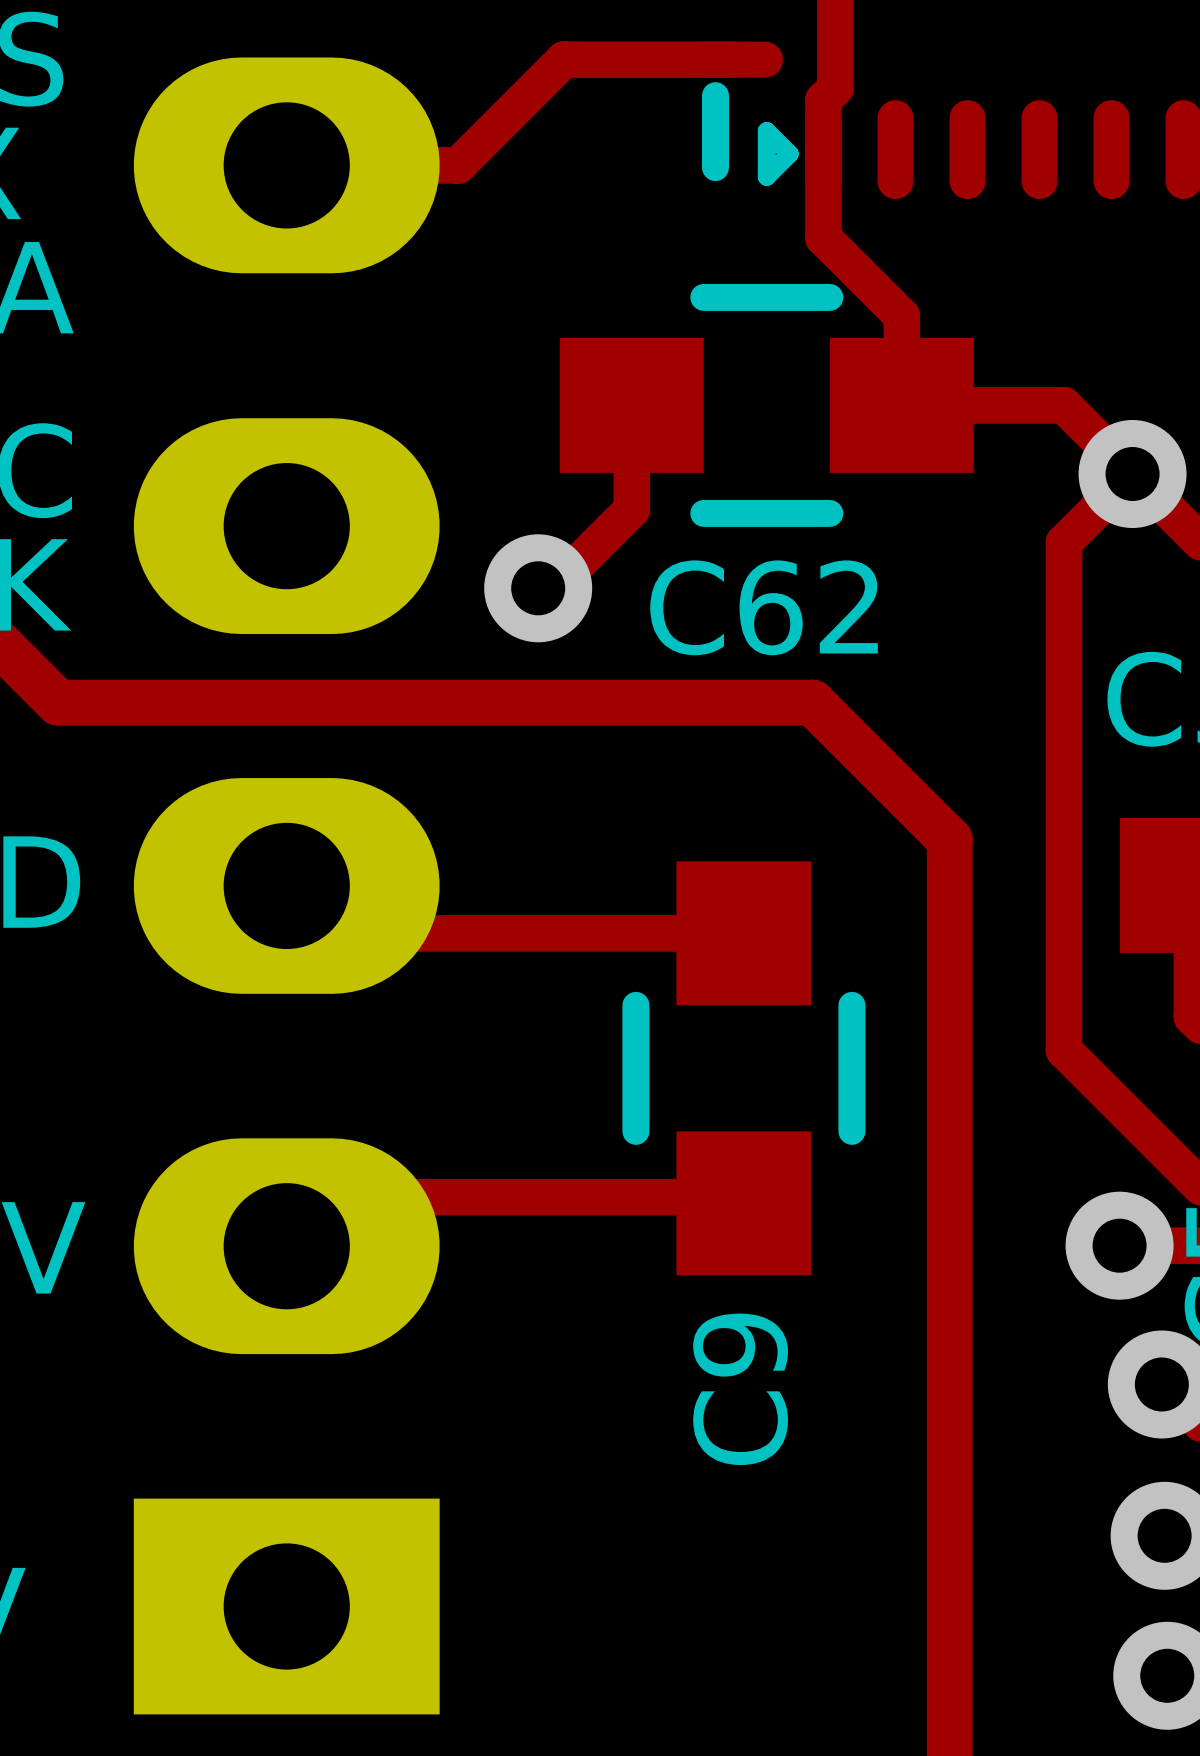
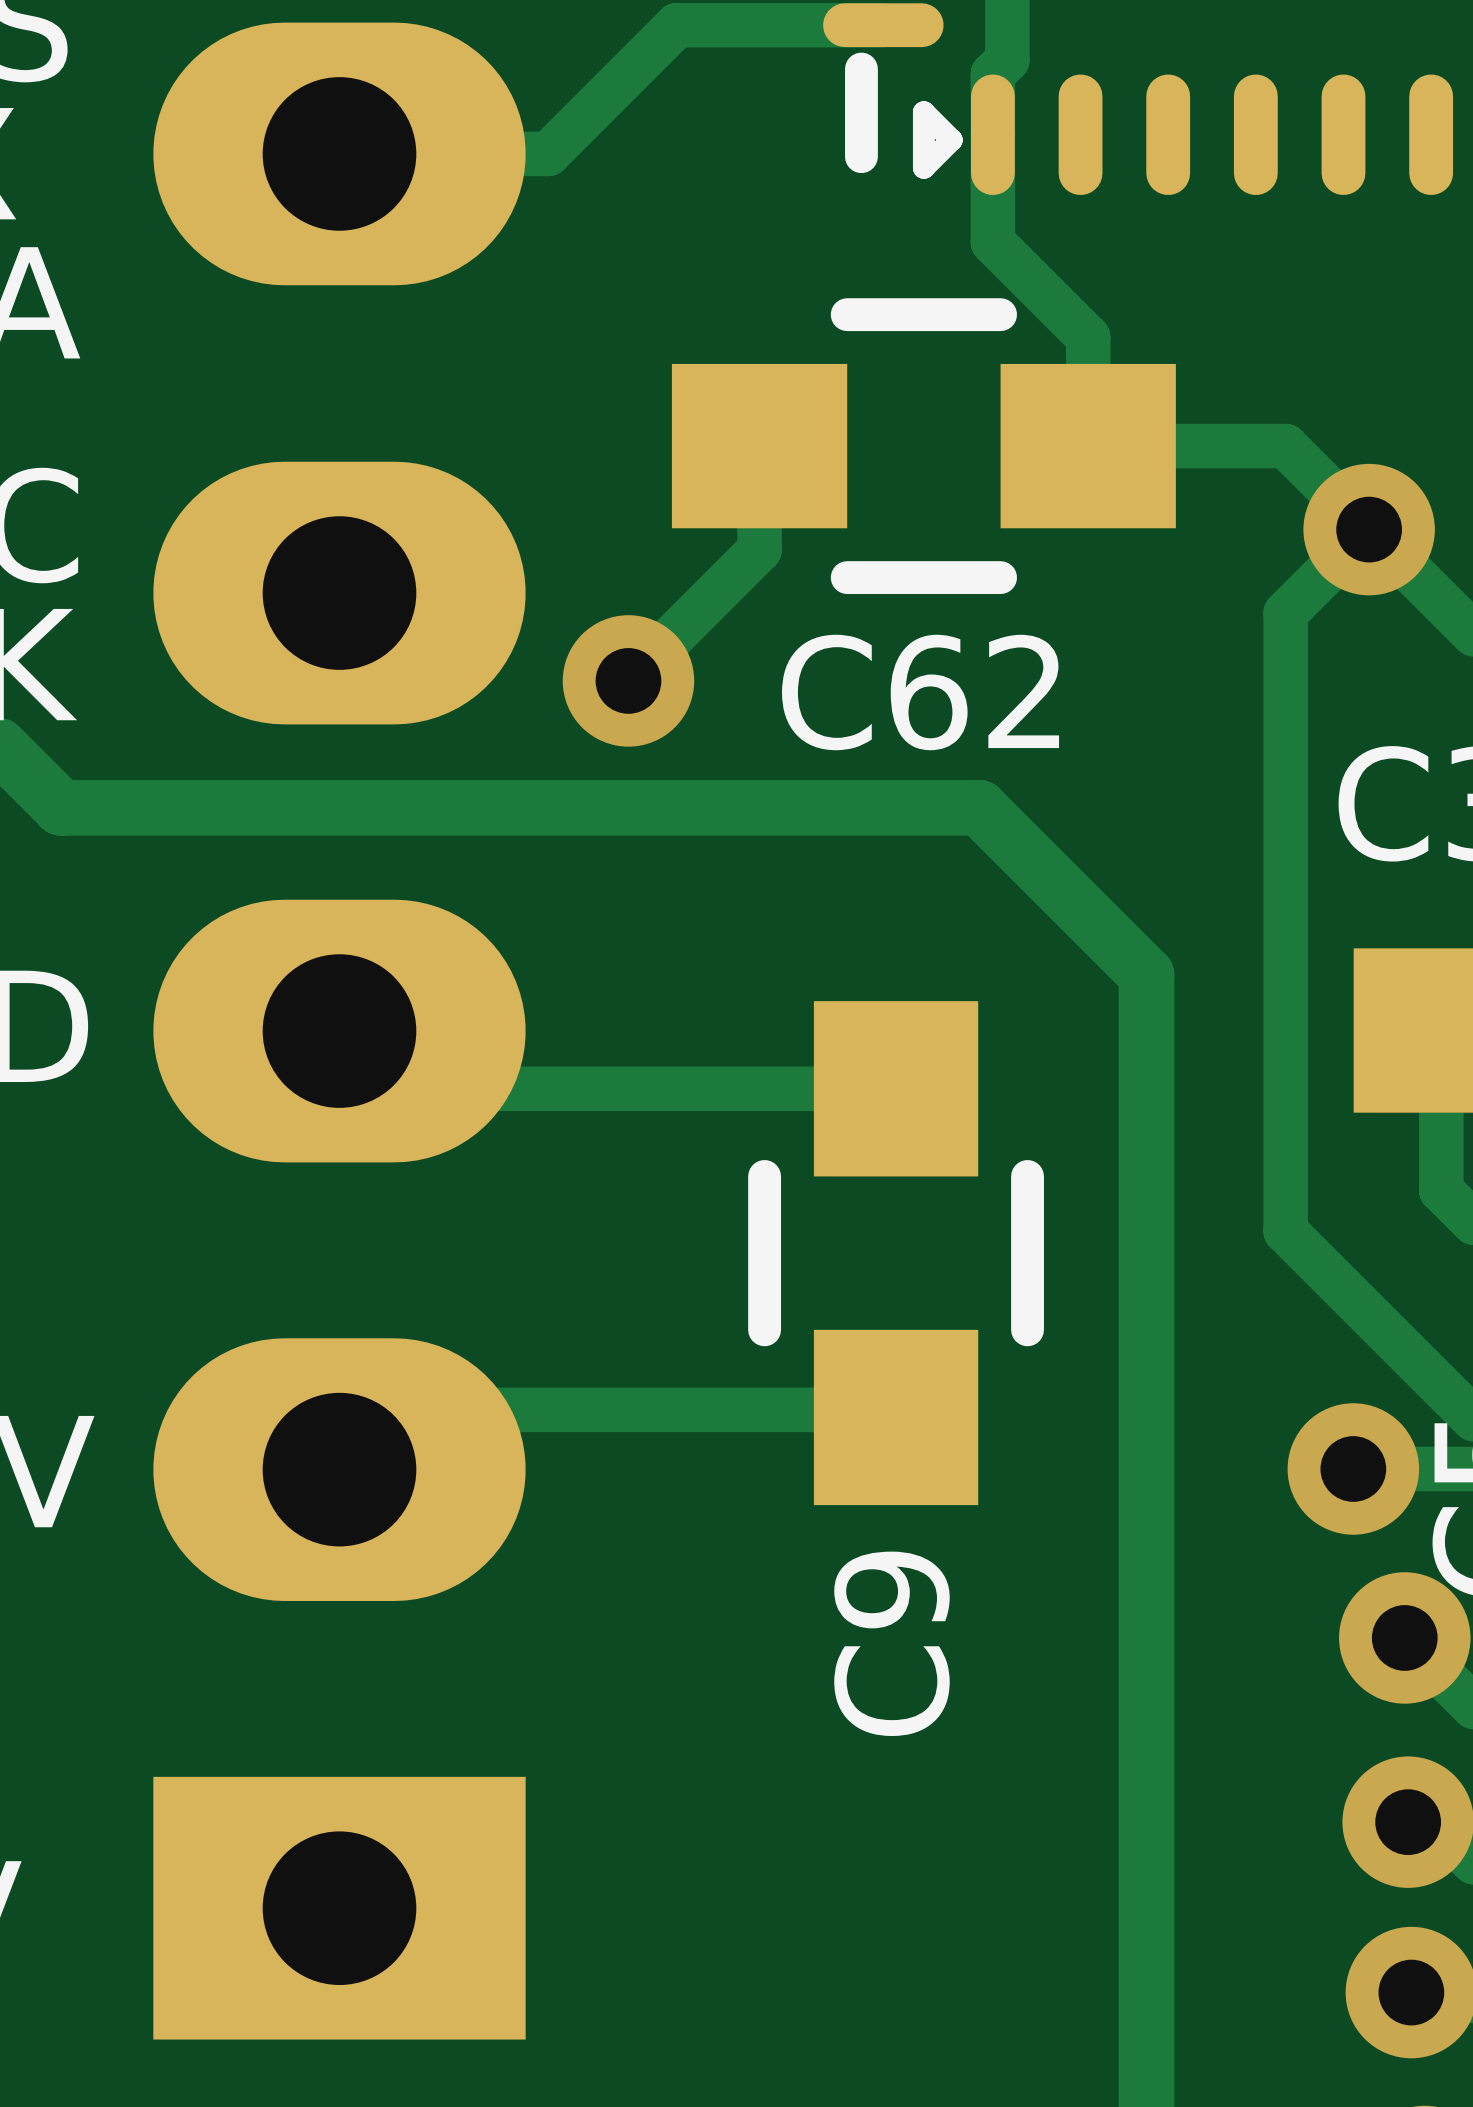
track: (631, 490) (631, 509) (552, 588) (538, 588) -> (759, 549) (628, 680)
via position: (538, 588) -> (628, 680)

